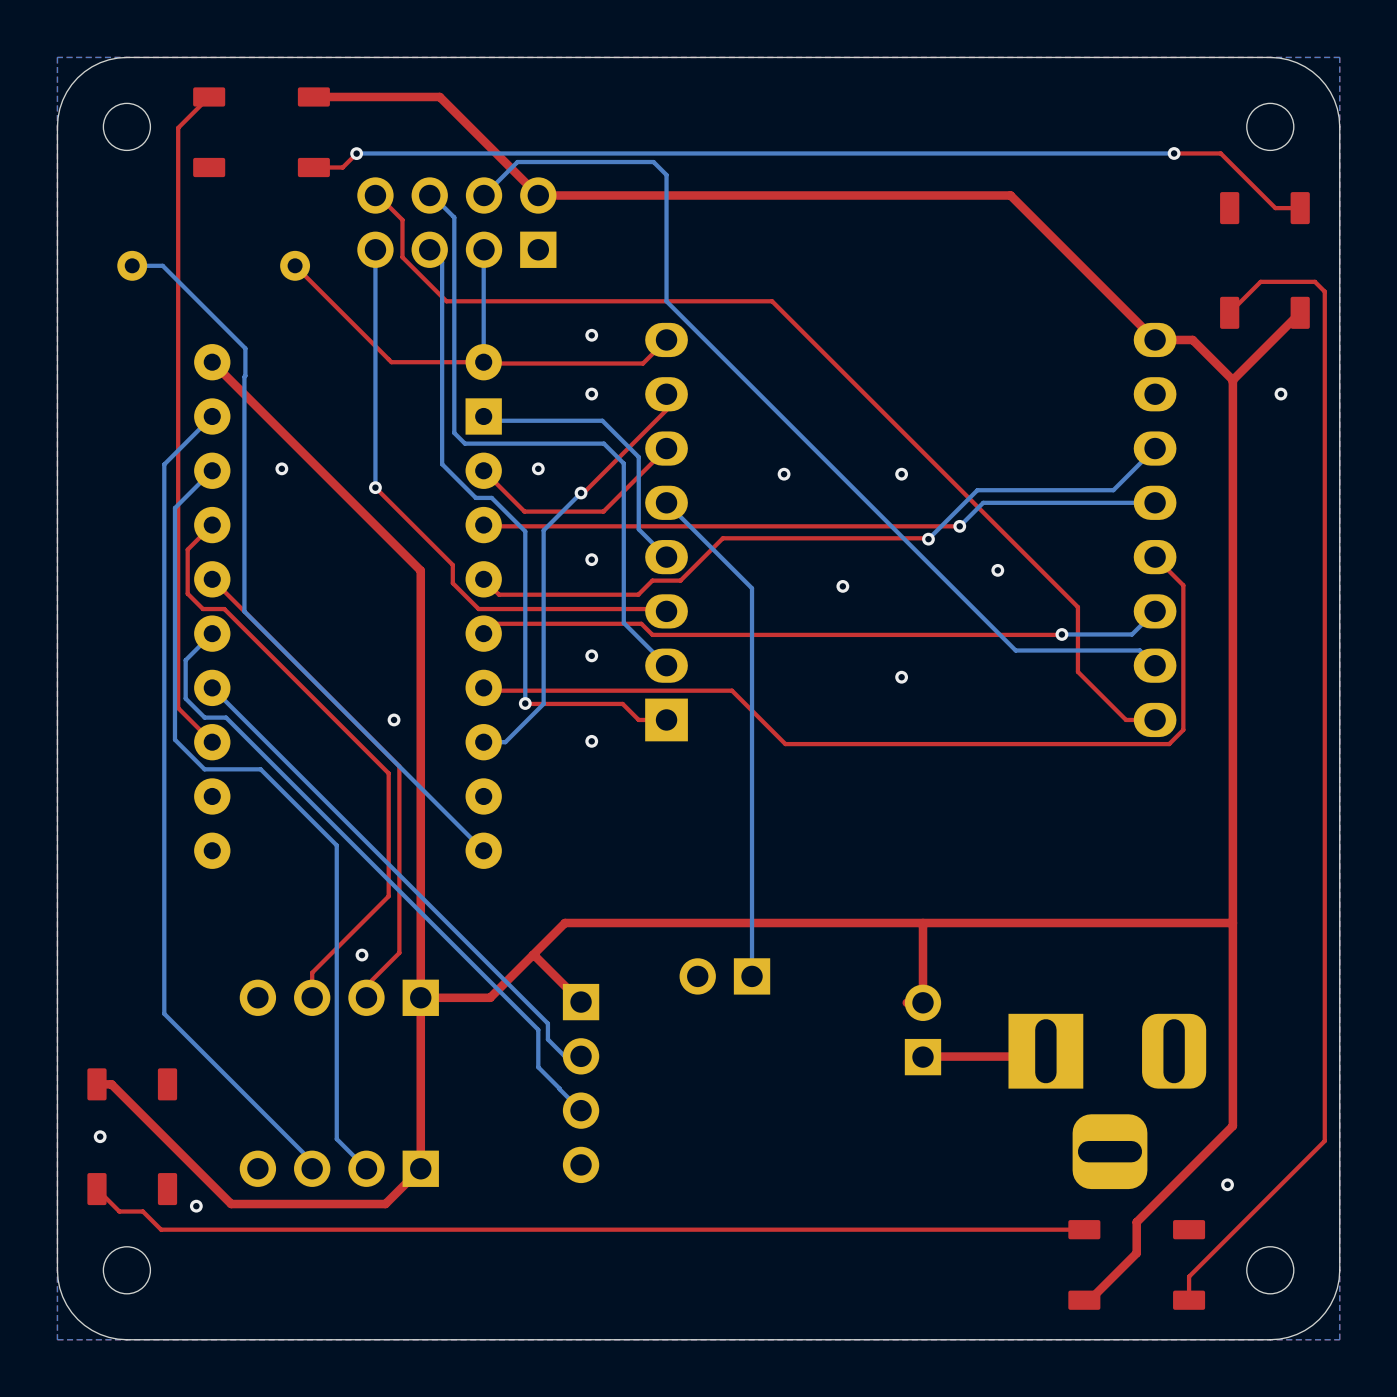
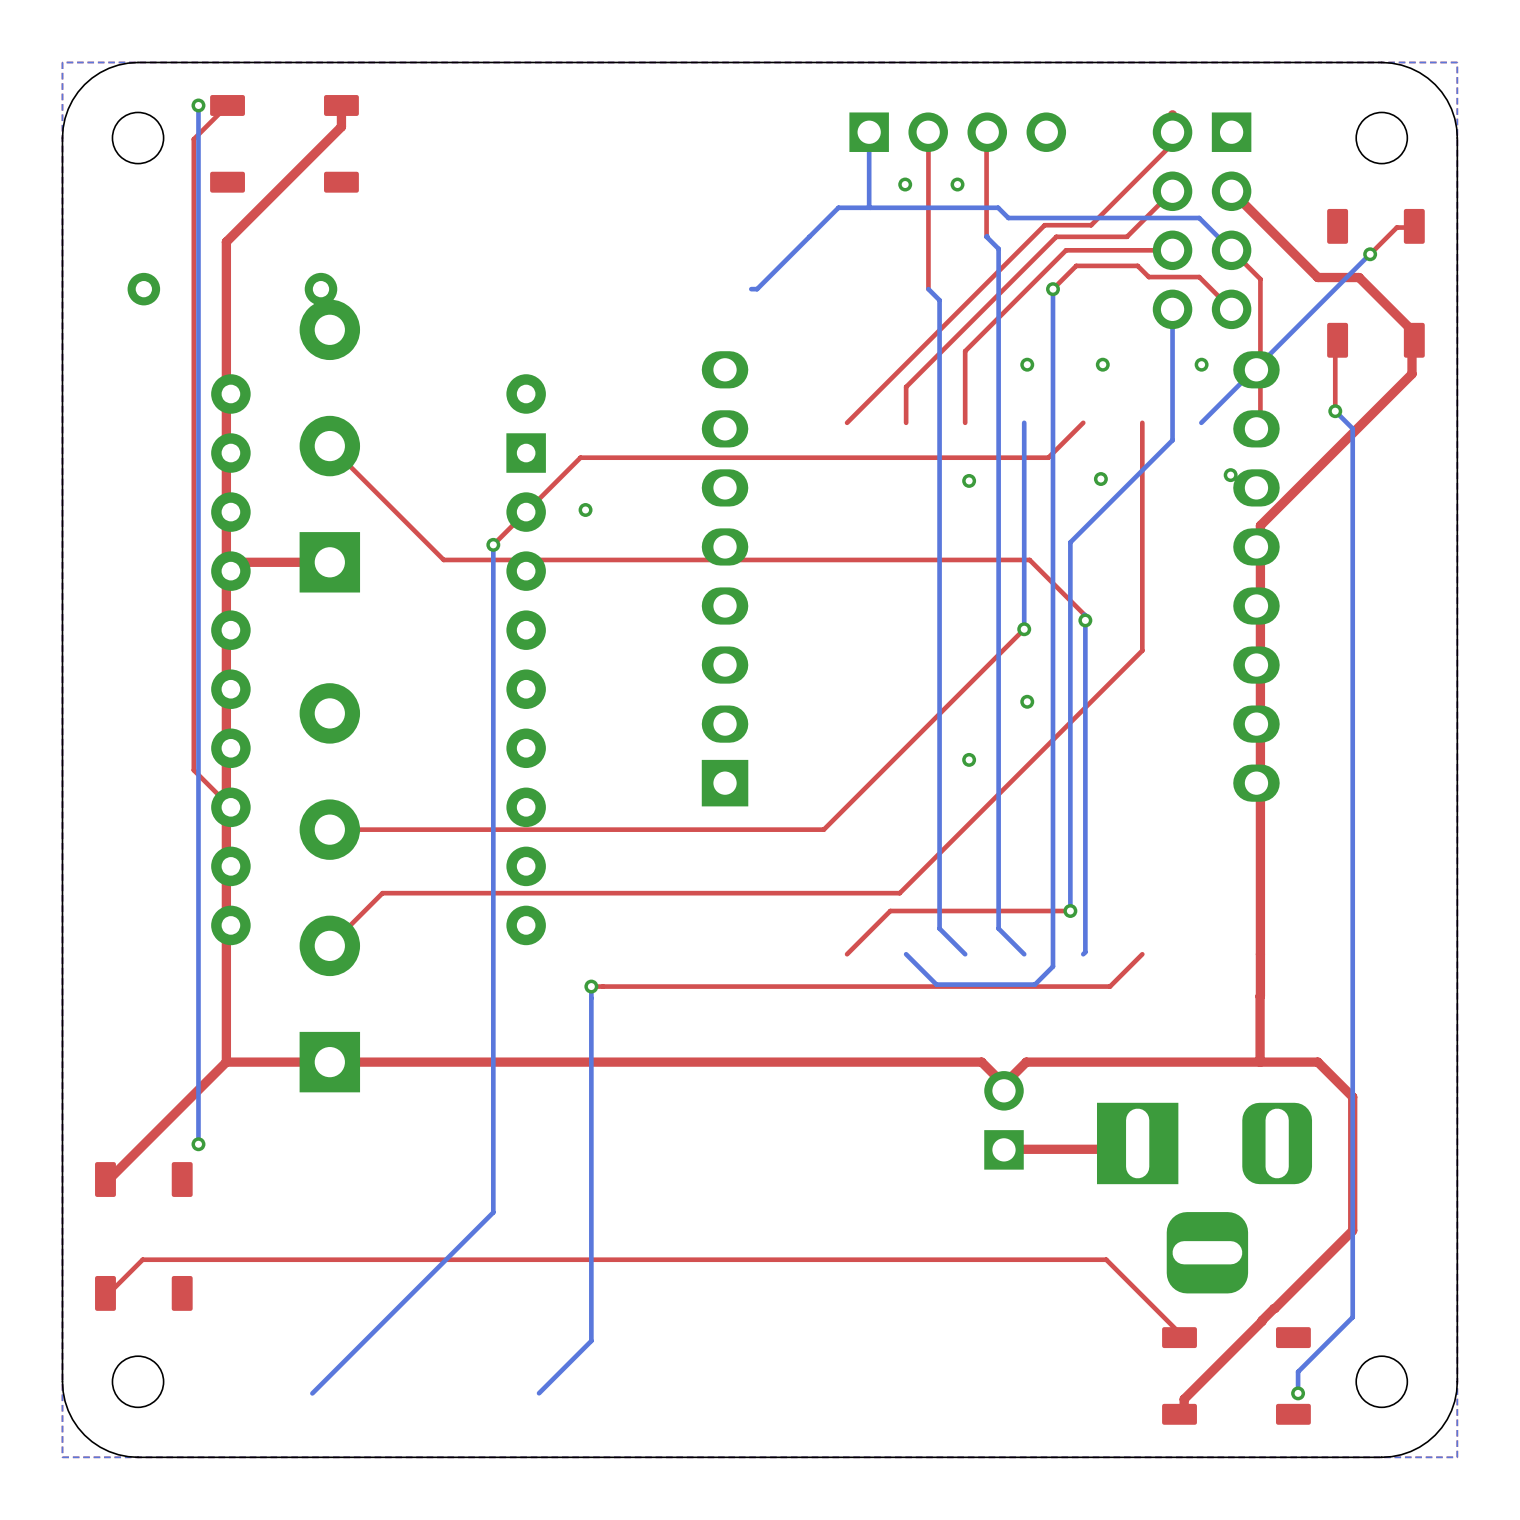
bottom track: none -> (198, 105) (198, 1144)
via: none -> (198, 105)
top track: (313, 96) (439, 96) (538, 195) -> (341, 105) (341, 126) (226, 241) (226, 1062)
top track: none -> (1172, 114) (1172, 143) (1091, 225) (1044, 225) (847, 422)
bottom track: none -> (869, 132) (870, 207)
top track: none -> (928, 132) (928, 289)
part: none -> (957, 132)
top track: none -> (987, 132) (986, 236)
top track: (356, 153) (342, 167) (313, 167) -> none
via: (356, 153) -> none
top track: (1174, 153) (1220, 153) (1275, 208) (1300, 208) -> none
bottom track: (1174, 153) (356, 153) -> none
via: (1174, 153) -> none
via: none -> (905, 184)
via: none -> (957, 184)
top track: none -> (1172, 191) (1126, 236) (1056, 236) (906, 387) (906, 422)
top track: none -> (1231, 191) (1317, 277) (1359, 277) (1411, 330) (1411, 374) (1260, 525) (1260, 1062)
top track: (375, 195) (378, 195) (402, 219) (402, 257) (446, 301) (772, 301) (1077, 607) (1077, 671) (1126, 719) (1155, 719) -> none
bottom track: (429, 195) (432, 195) (454, 217) (454, 432) (464, 443) (603, 443) (623, 463) (623, 622) (666, 665) -> none
bottom track: (484, 195) (517, 162) (653, 162) (666, 174) (666, 301) (1015, 650) (1139, 650) (1155, 665) -> none
top track: (554, 195) (1010, 195) (1155, 339) (1192, 339) (1232, 380) -> none
part: none -> (1202, 220)
top track: none -> (1411, 227) (1396, 227) (1370, 254)
bottom track: none -> (987, 236) (998, 248) (998, 928) (1024, 954)
part: (456, 222) -> none
top track: none -> (1172, 250) (1066, 250) (965, 351) (965, 422)
top track: none -> (1231, 250) (1260, 279) (1260, 422)
bottom track: none -> (1231, 250) (1199, 218) (1008, 218) (998, 207) (838, 207) (757, 289) (751, 289)
bottom track: none -> (1369, 254) (1201, 422)
via: none -> (1370, 254)
bottom track: (375, 249) (375, 487) -> none
bottom track: (429, 249) (442, 262) (442, 464) (475, 497) (491, 497) (525, 531) (525, 703) -> none
bottom track: (484, 249) (483, 362) -> none
bottom track: (132, 265) (162, 265) (245, 348) (244, 611) (483, 850) -> none
top track: (295, 265) (391, 362) (642, 363) (666, 339) -> none
bottom track: none -> (928, 289) (939, 300) (939, 928) (965, 954)
top track: none -> (1052, 289) (1076, 265) (1137, 265) (1148, 277) (1199, 277) (1231, 309)
bottom track: none -> (1052, 289) (1052, 966) (1034, 984) (936, 984) (906, 954)
via: none -> (1052, 289)
bottom track: none -> (1172, 309) (1172, 440) (1070, 542) (1070, 911)
top track: (1229, 312) (1260, 281) (1314, 281) (1324, 291) (1324, 1140) (1189, 1276) (1189, 1300) -> none
top track: (1300, 312) (1232, 380) -> none
top track: none -> (1335, 341) (1335, 411)
via: (591, 335) -> none
via: none -> (1027, 364)
via: none -> (1102, 364)
via: none -> (1201, 364)
top track: (212, 362) (420, 570) (420, 1168) (385, 1204) (231, 1204) (111, 1084) (96, 1084) -> none
bottom track: none -> (1335, 411) (1352, 428) (1352, 1317) (1298, 1371) (1298, 1393)
top track: (1232, 380) (1232, 1126) (1136, 1222) (1136, 1253) (1089, 1300) (1084, 1300) -> none
bottom track: none -> (1024, 422) (1024, 629)
top track: none -> (1083, 422) (1048, 457) (580, 457) (493, 544)
top track: none -> (1142, 422) (1142, 650) (899, 893) (382, 893) (329, 945)
via: (591, 394) -> none
top track: (666, 394) (666, 410) (583, 492) (581, 492) -> none
via position: (1280, 394) -> (1335, 411)
top track: none -> (329, 446) (443, 559) (1029, 559) (1084, 614)
part: none -> (329, 446)
bottom track: (212, 416) (164, 464) (164, 1013) (312, 1161) (312, 1168) -> none
bottom track: (483, 416) (487, 420) (602, 420) (638, 457) (638, 529) (666, 557) -> none
via: none -> (1230, 475)
via: none -> (1100, 479)
top track: (666, 448) (603, 511) (524, 511) (483, 470) -> none
bottom track: (1155, 448) (1113, 490) (977, 490) (928, 539) -> none
via: (281, 468) -> none
bottom track: (212, 470) (174, 508) (174, 739) (204, 769) (260, 769) (336, 845) (336, 1139) (366, 1168) -> none
via: (784, 474) -> none
via position: (901, 474) -> (969, 480)
top track: (375, 487) (452, 565) (452, 583) (478, 609) (664, 609) (666, 611) -> none
via: (375, 487) -> none
bottom track: (581, 492) (543, 530) (543, 703) (505, 742) (483, 742) -> none
via: (581, 492) -> none
bottom track: none -> (493, 544) (493, 1212) (312, 1393)
via: none -> (493, 544)
bottom track: (666, 502) (752, 588) (752, 976) -> none
bottom track: (1155, 502) (983, 502) (959, 526) -> none
top track: none -> (329, 562) (226, 562)
top track: (212, 525) (187, 549) (187, 593) (202, 609) (224, 609) (388, 773) (388, 896) (312, 972) (312, 997) -> none
top track: (483, 525) (959, 526) -> none
via: (959, 526) -> none
top track: (928, 539) (722, 538) (680, 580) (652, 580) (638, 594) (499, 594) (483, 579) -> none
via: (928, 539) -> none
top track: (1155, 557) (1183, 585) (1183, 729) (1169, 744) (785, 744) (732, 690) (486, 690) (483, 687) -> none
via: (591, 559) -> none
bottom track: none -> (1084, 614) (1085, 952) (1083, 954)
top track: none -> (1024, 629) (823, 829) (329, 829)
via: none -> (1024, 629)
top track: (212, 579) (399, 766) (399, 952) (366, 985) (366, 997) -> none
via: (842, 586) -> none
bottom track: (1155, 611) (1132, 634) (1061, 634) -> none
bottom track: (212, 633) (185, 660) (185, 698) (204, 717) (226, 717) (538, 1029) (538, 1067) (581, 1110) -> none
top track: (483, 633) (493, 623) (641, 623) (652, 634) (1061, 634) -> none
via: (1061, 634) -> none
via: none -> (1027, 701)
via: (591, 655) -> none
via position: (901, 677) -> (969, 759)
bottom track: (212, 687) (547, 1023) (547, 1039) (564, 1056) (581, 1056) -> none
top track: (525, 703) (622, 703) (638, 719) (666, 719) -> none
via: (525, 703) -> none
via: (394, 719) -> none
via: (591, 741) -> none
part: none -> (329, 887)
top track: none -> (1070, 911) (890, 911) (847, 954)
via: none -> (1070, 911)
top track: none -> (1142, 954) (1110, 986) (591, 986)
bottom track: none -> (591, 986) (591, 1340) (539, 1393)
via: none -> (591, 986)
top track: (922, 922) (922, 1002) (906, 1002) -> none
top track: (1232, 922) (565, 922) (490, 997) (420, 997) -> none
via: (361, 955) -> none
top track: (534, 955) (581, 1002) -> none
top track: none -> (226, 1062) (981, 1062) (1004, 1084) (1026, 1062) (1317, 1062) (1352, 1096) (1352, 1230) (1184, 1399) (1184, 1417)
top track: none -> (226, 1062) (108, 1179)
part: (724, 976) -> none
part: (339, 997) -> none
via: none -> (198, 1144)
part: (581, 1083) -> none
via: (100, 1136) -> none
part: (339, 1168) -> none
via position: (1227, 1184) -> (1298, 1393)
top track: (96, 1189) (119, 1211) (142, 1211) (161, 1229) (1084, 1229) -> none
top track: none -> (108, 1293) (142, 1259) (1106, 1259) (1184, 1337)
via: (196, 1206) -> none

